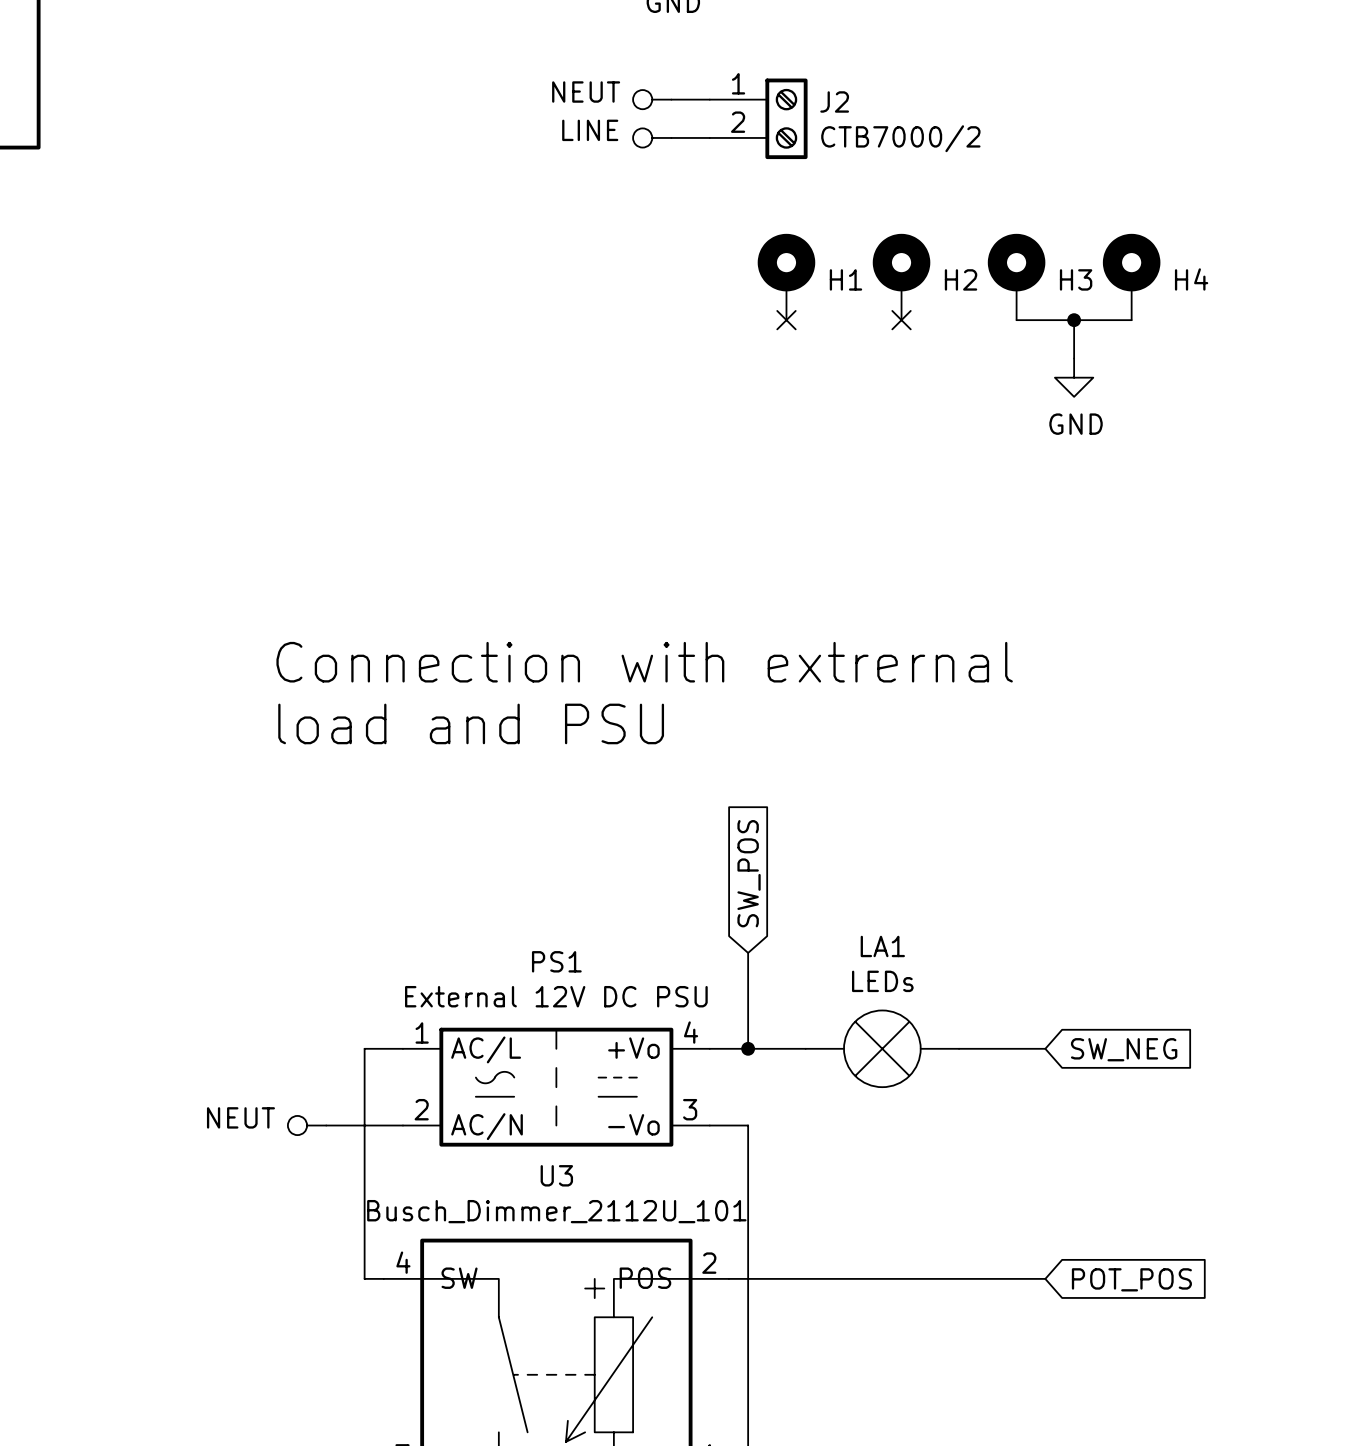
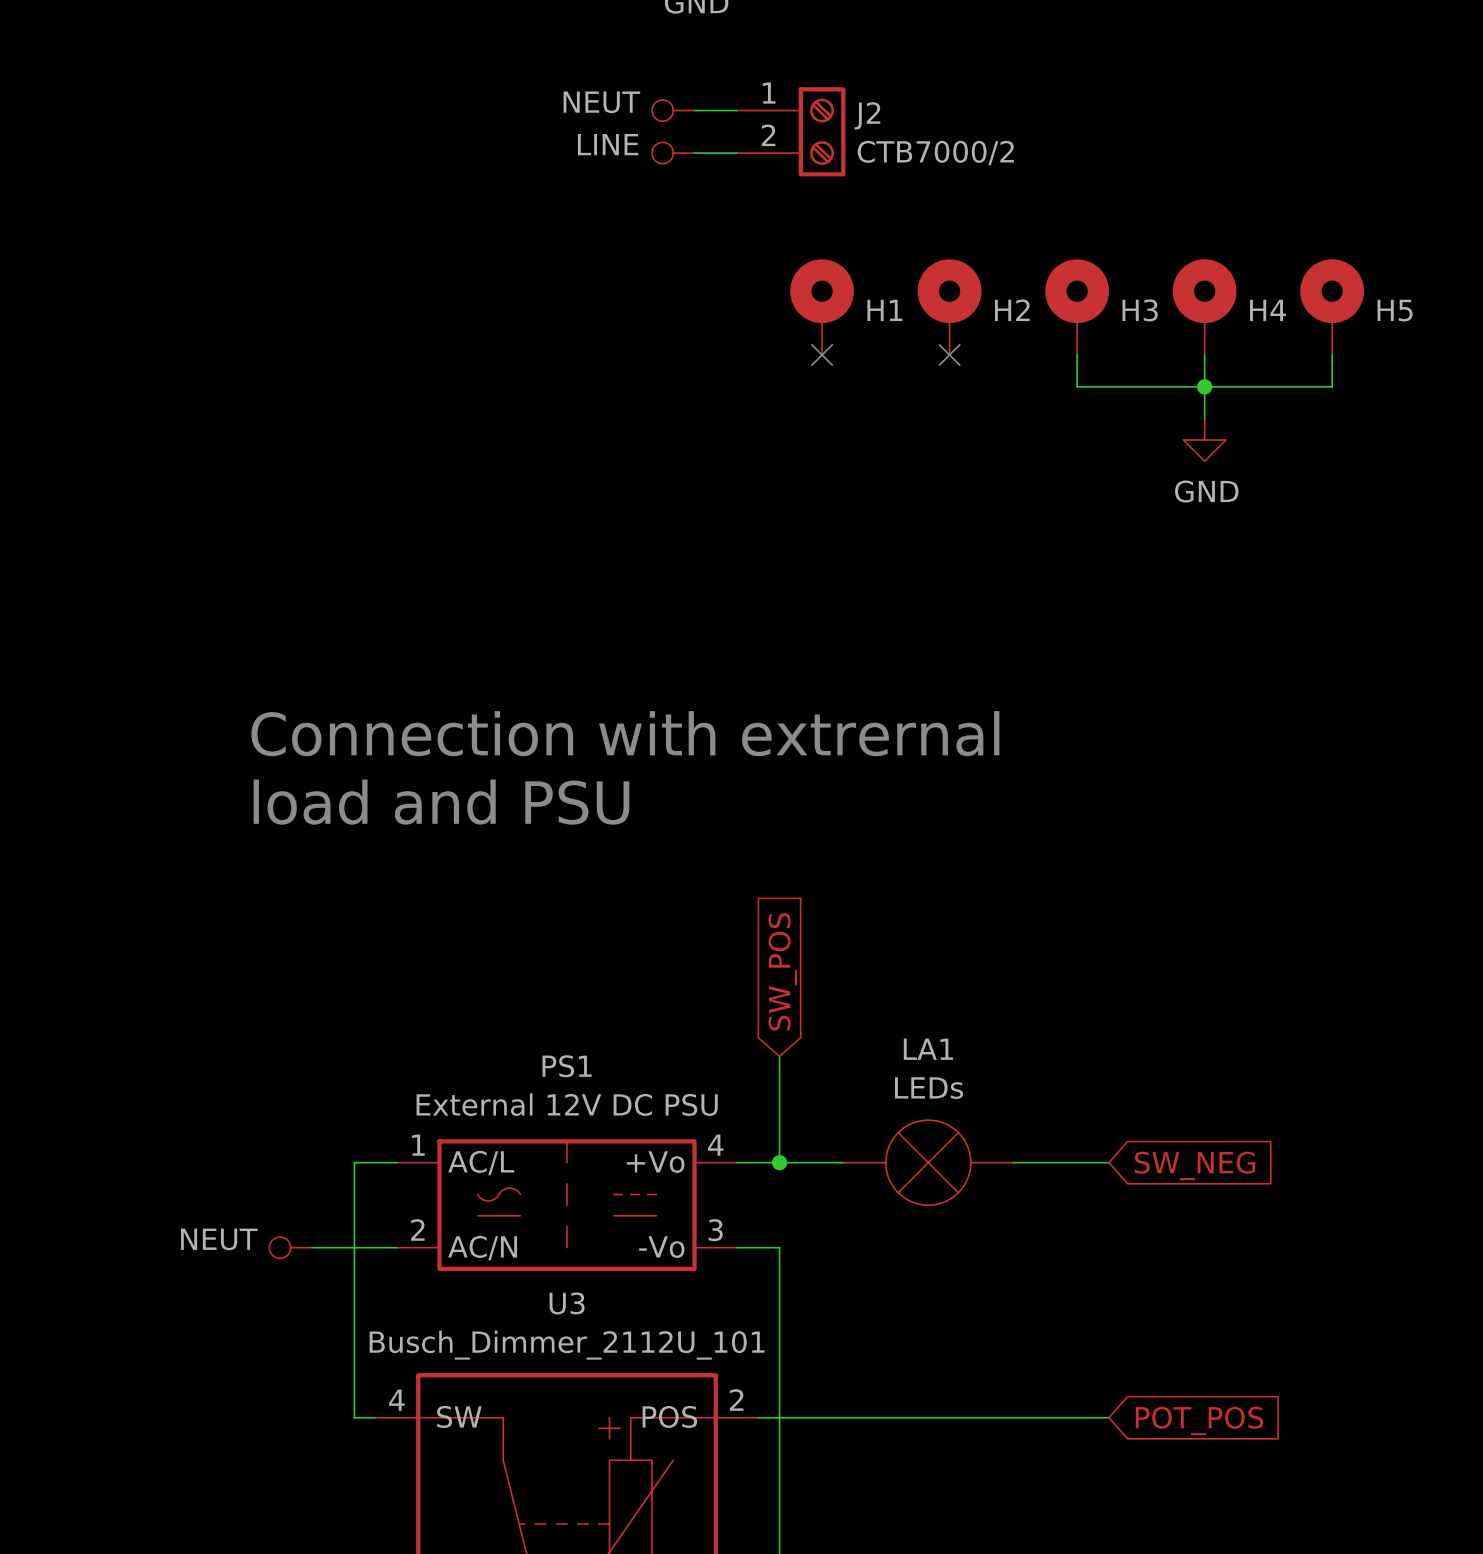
H5: none -> (1332, 307)
wire: (1016, 320) (1131, 320) -> (1077, 354) (1077, 386) (1332, 386) (1332, 354)
wire: (1074, 320) (1074, 358) -> none
junction position: (1074, 320) -> (1204, 386)
wire: none -> (1204, 354) (1204, 418)
power symbol position: GND (1074, 377) -> GND (1204, 440)

